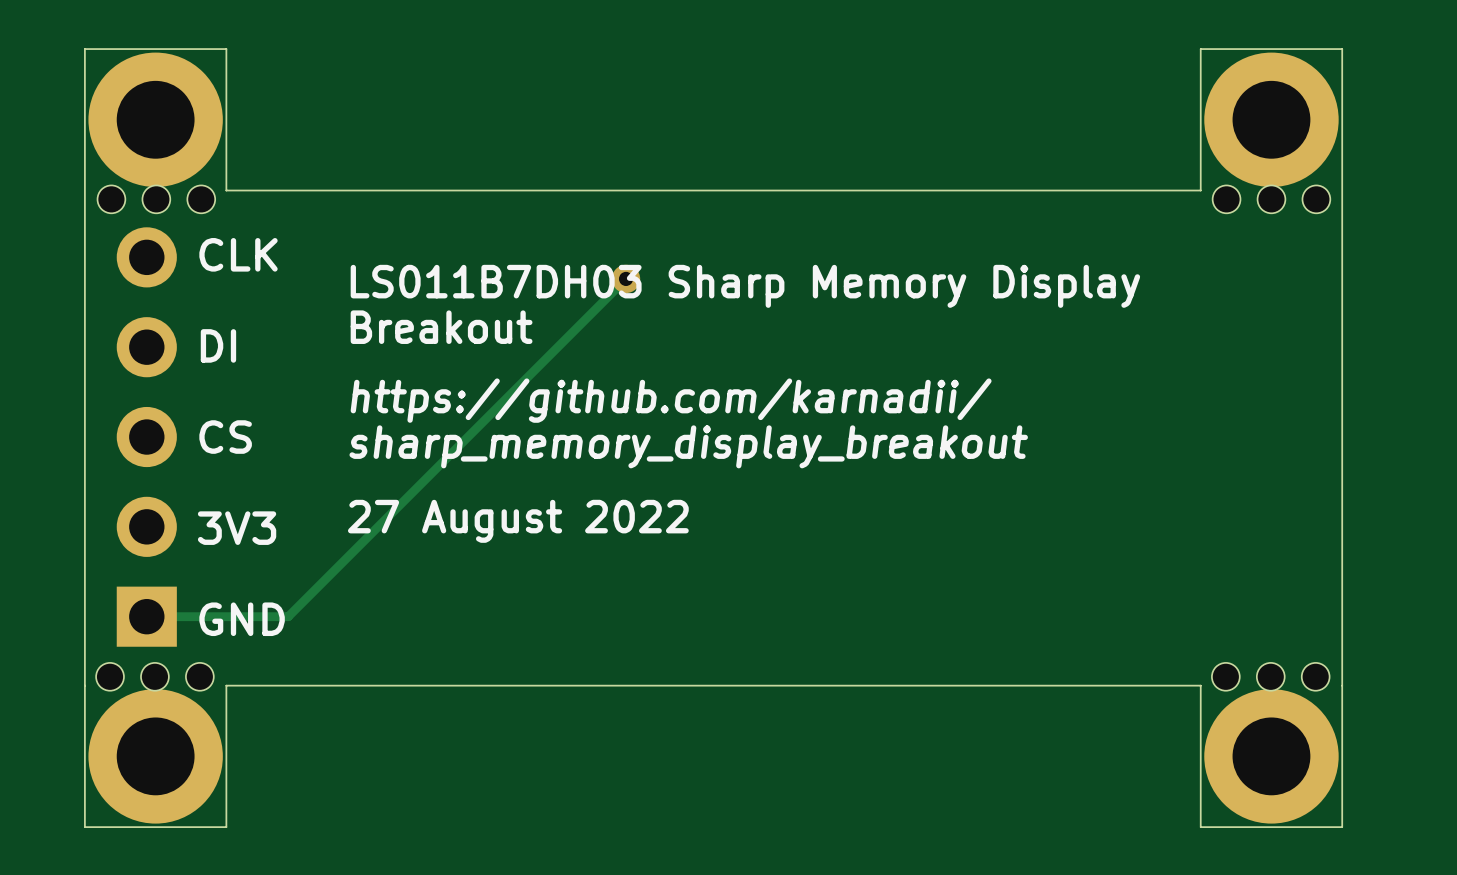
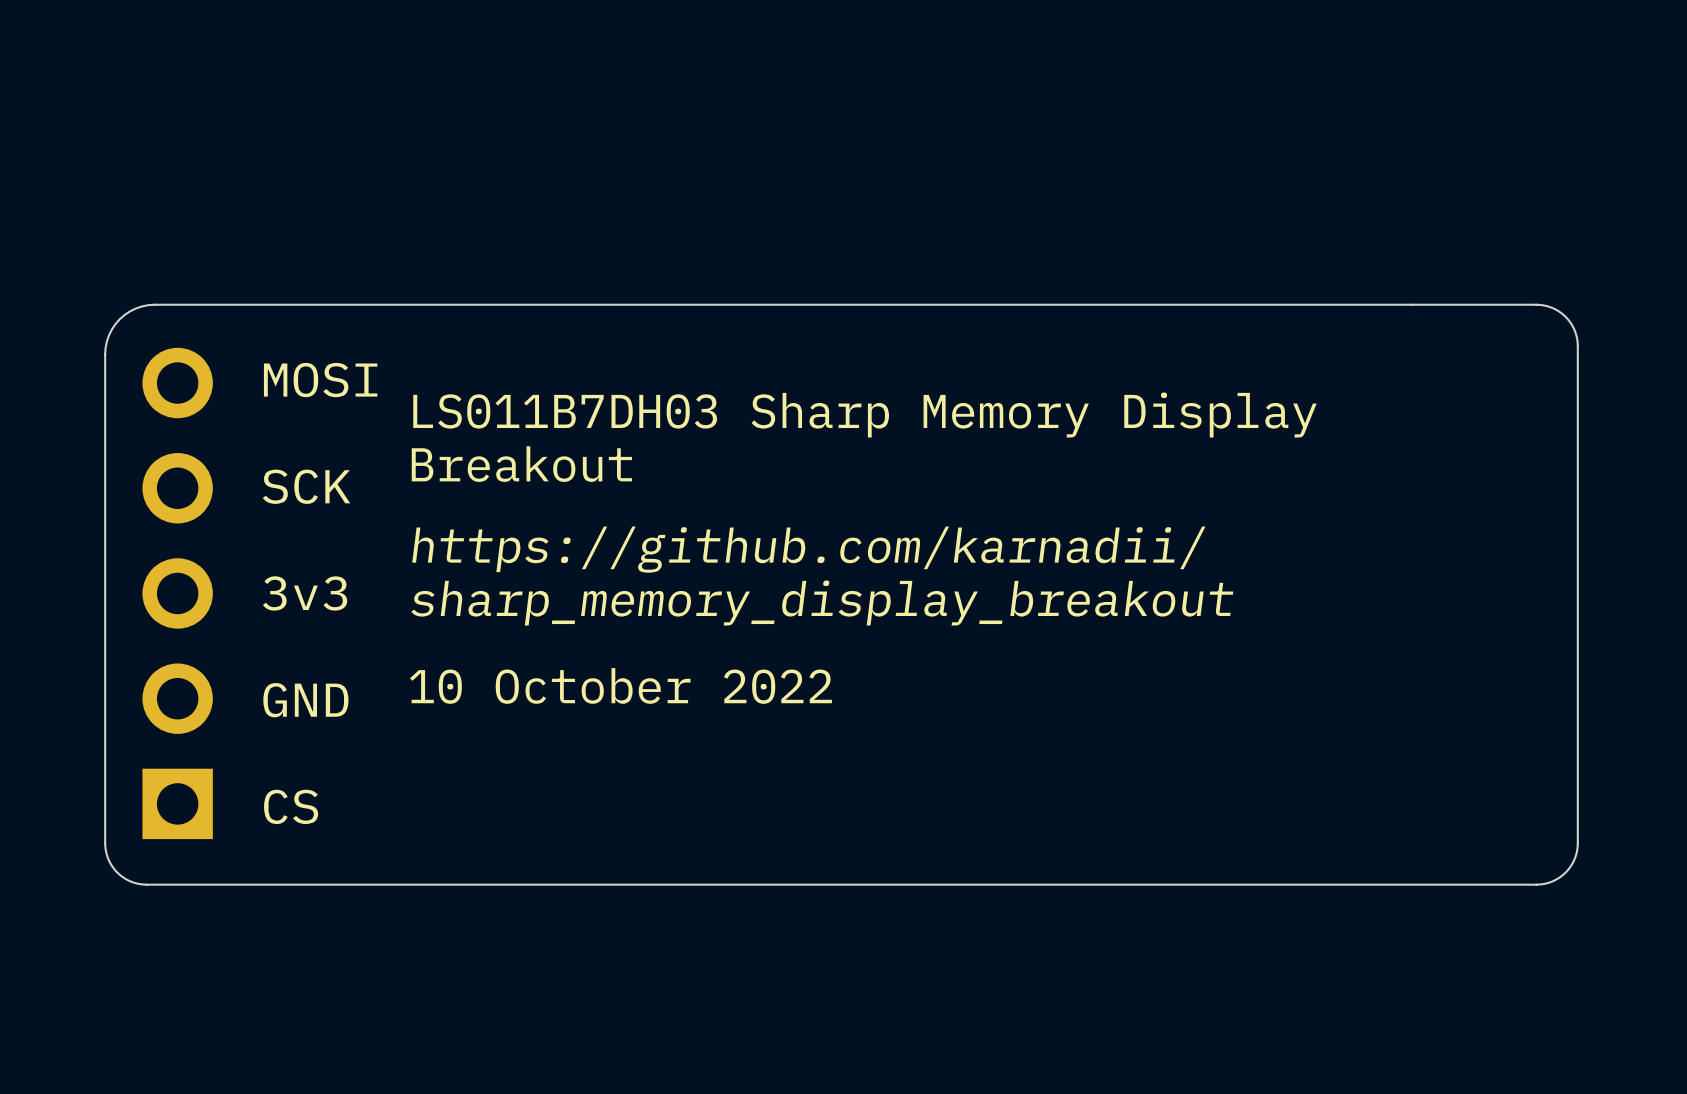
part: (155, 119) -> none
part: (1271, 119) -> none
board edge: (226, 190) (226, 49) (84, 49) (84, 232) -> (270, 304) (154, 304) (142, 306) (124, 315) (115, 324) (108, 335) (105, 354)
board edge: (1200, 190) (1200, 49) (1342, 49) (1342, 225) -> (1412, 304) (1545, 305) (1558, 311) (1568, 320) (1575, 332) (1577, 346)
part: (156, 199) -> none
part: (1271, 199) -> none
text: CLK (238, 254) -> MOSI (320, 380)
track: (626, 278) (288, 616) (146, 616) -> none
via: (626, 278) -> none
text: DI (218, 345) -> SCK (306, 486)
text position: CS (225, 437) -> CS (291, 806)
text: none -> 3v3 (305, 593)
text: 27 August 2022 (518, 521) -> 10 October 2022 (620, 685)
text: 3V3 (237, 528) -> none
text position: GND (242, 619) -> GND (305, 700)
board edge: (84, 650) (84, 827) (226, 827) (226, 685) -> (105, 843) (107, 856) (114, 869) (124, 878) (137, 883) (270, 884)
board edge: (1342, 650) (1342, 827) (1200, 827) (1200, 685) -> (1577, 843) (1575, 856) (1568, 869) (1558, 878) (1545, 883) (1412, 884)
part: (154, 676) -> none
part: (1270, 676) -> none
part: (155, 756) -> none
part: (1271, 756) -> none

